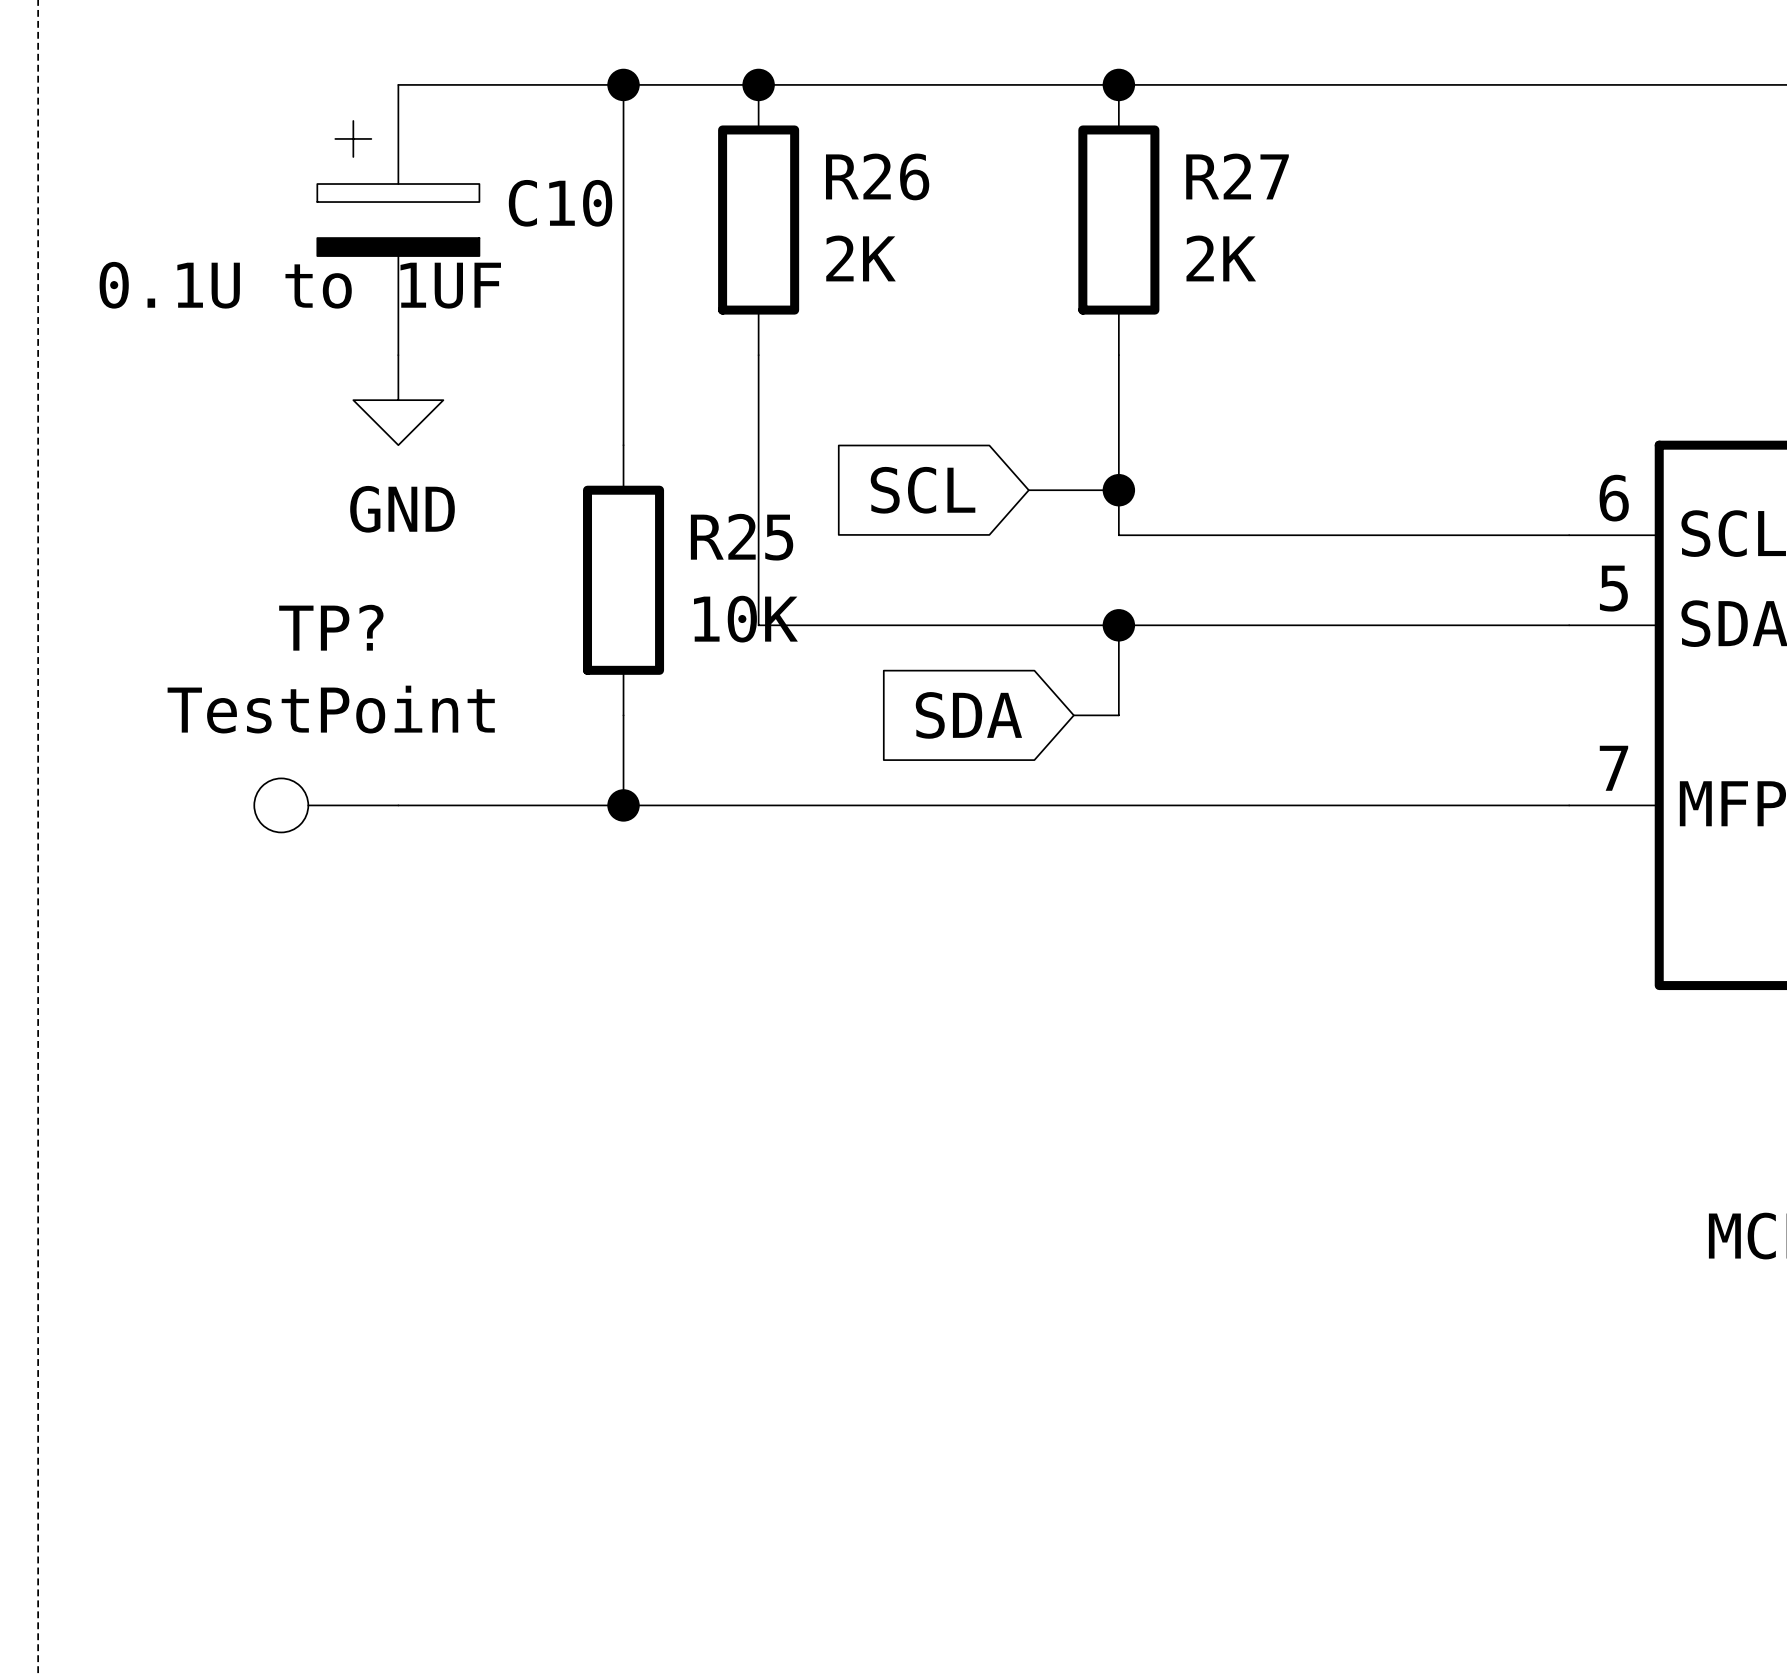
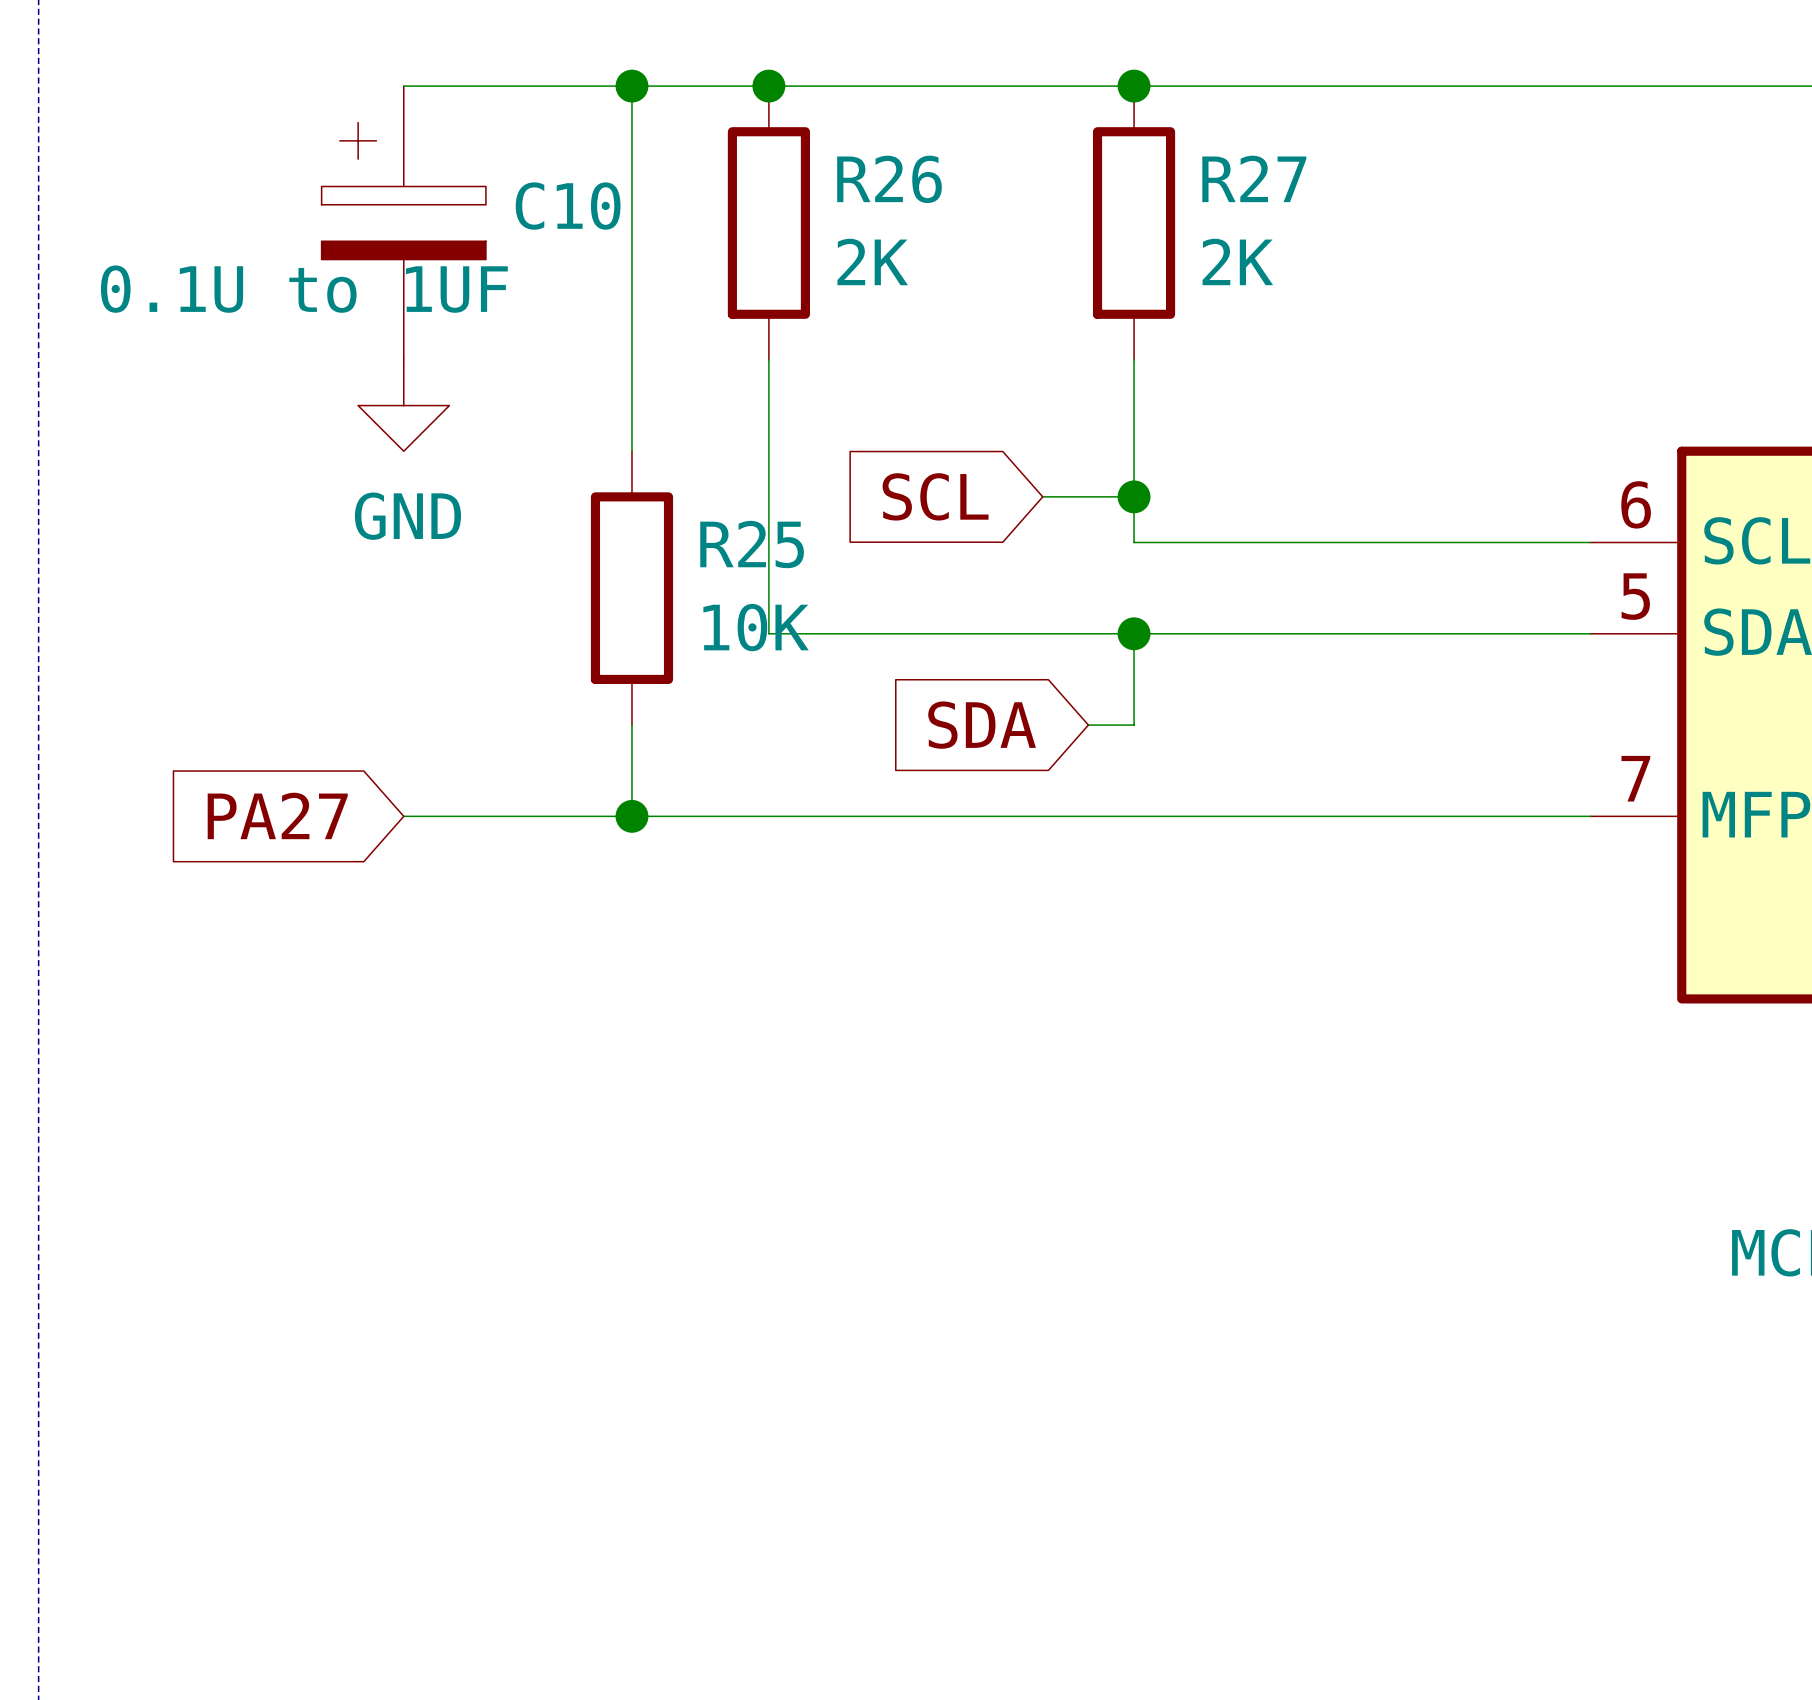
global label: none -> PA27 (277, 815)
TP?: TestPoint (326, 805) -> none

